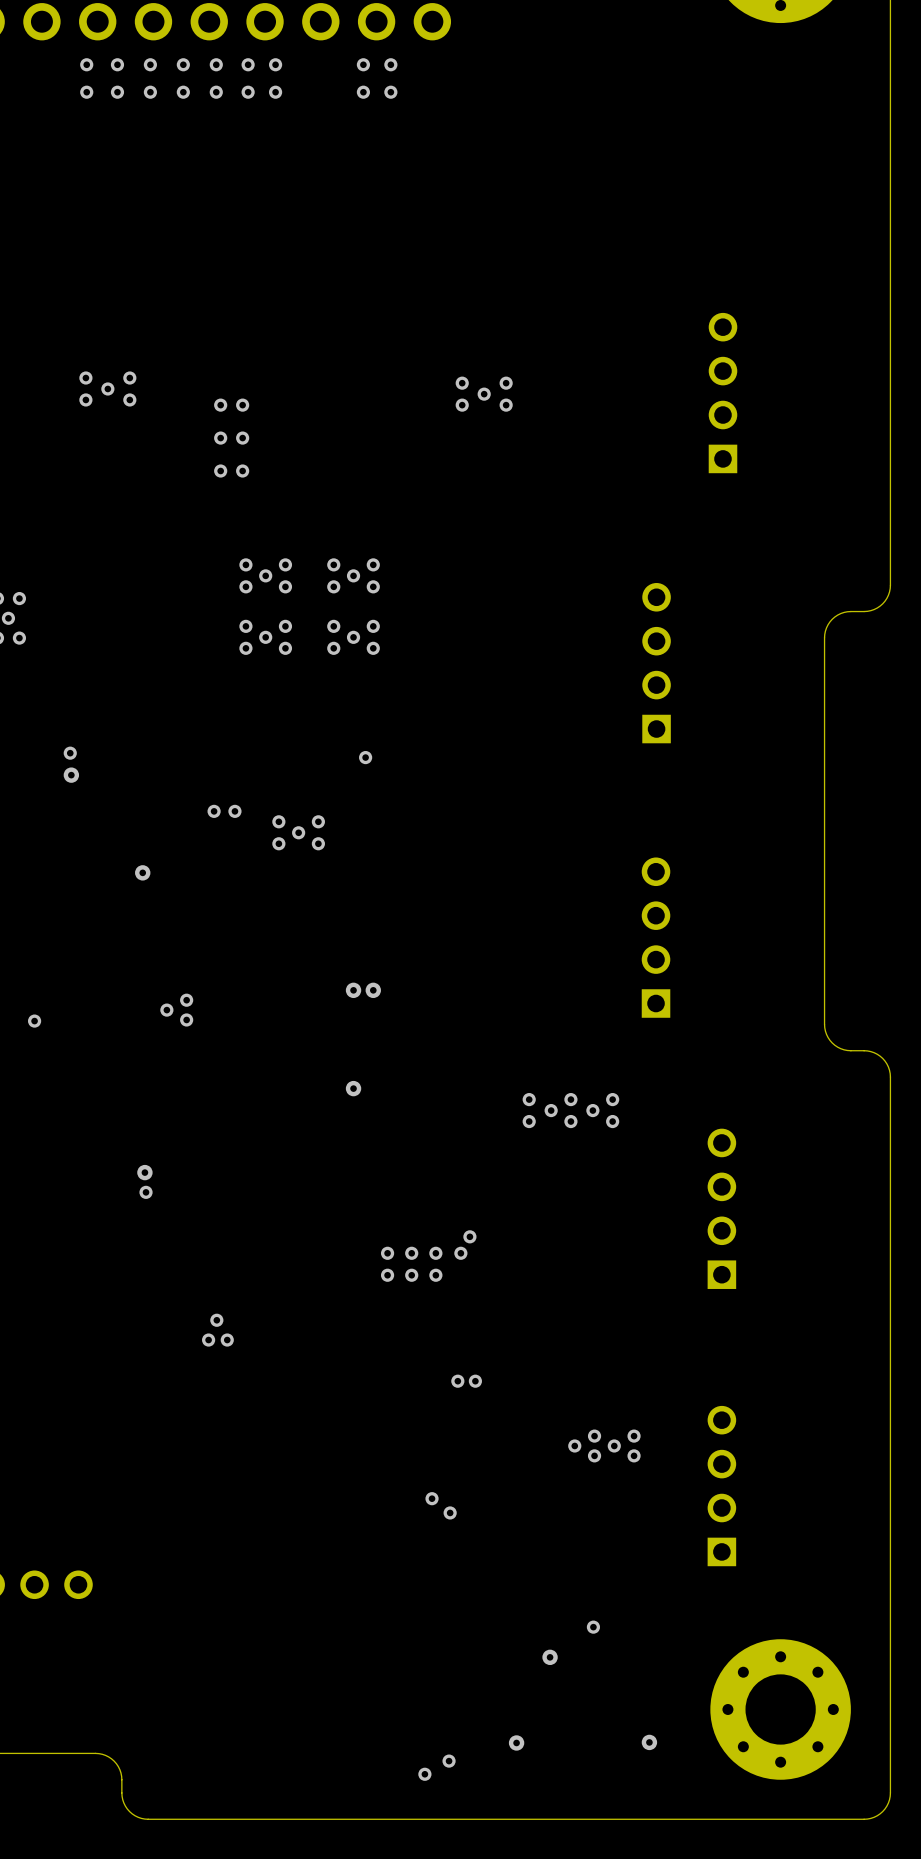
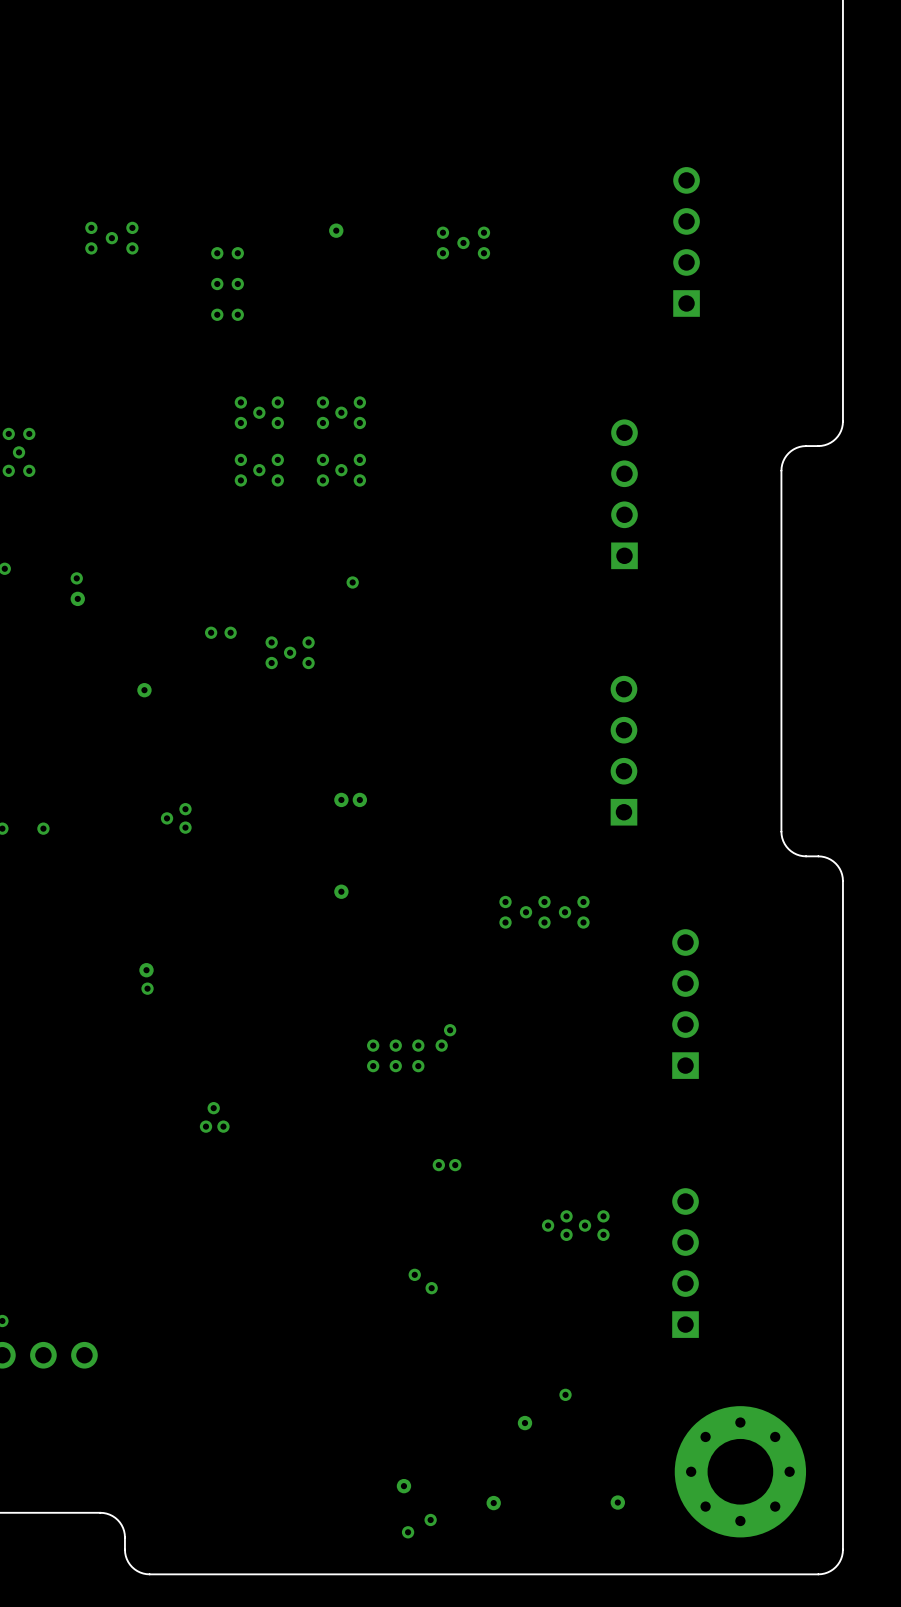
via: none -> (336, 230)
via: none -> (403, 1486)

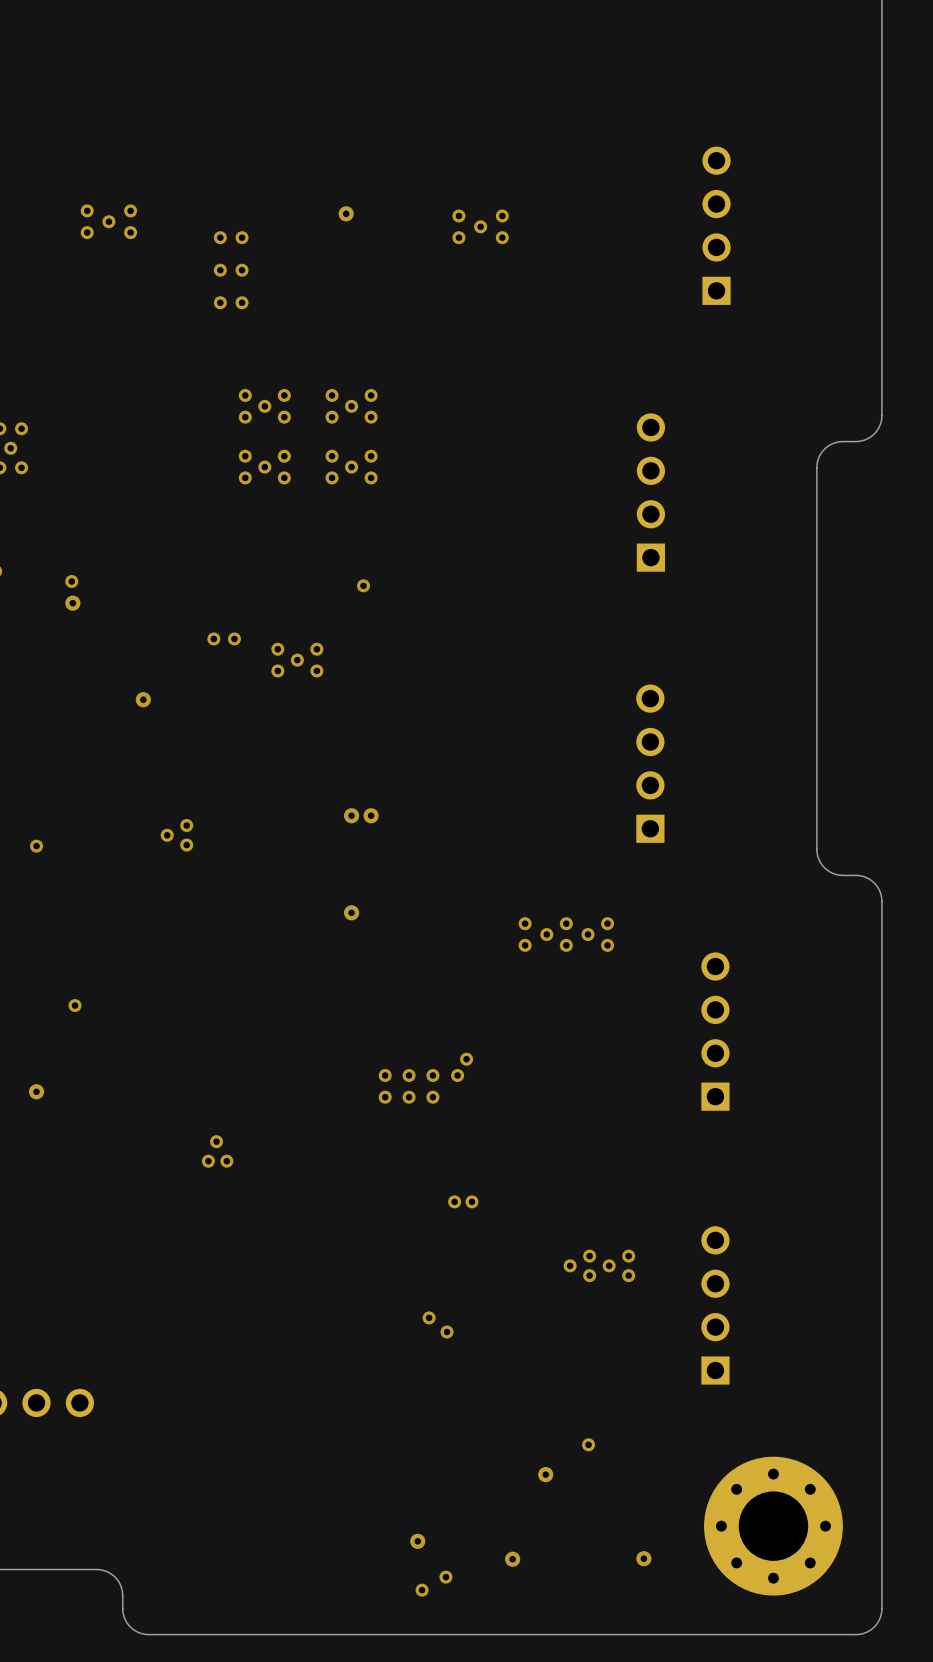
via: (146, 970) -> none
via position: (147, 988) -> (75, 1005)
via: none -> (36, 1091)

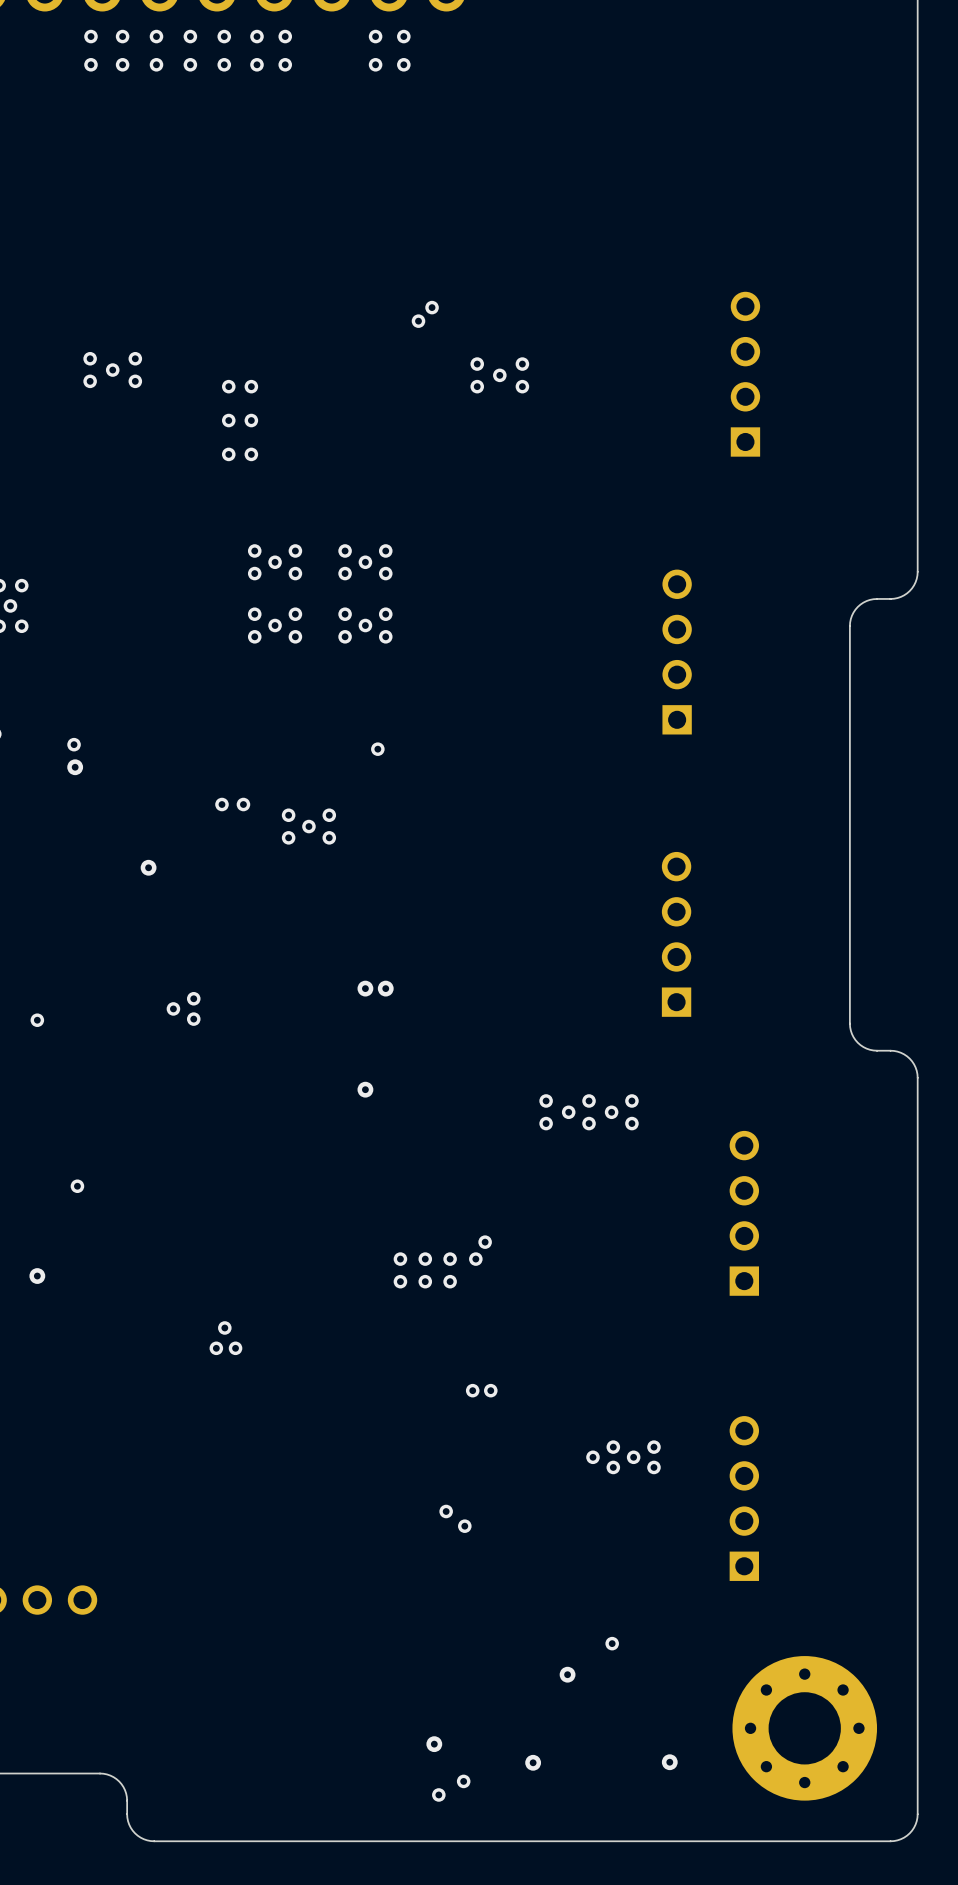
via: none -> (432, 307)
via: none -> (418, 321)
via: (346, 213) -> none

